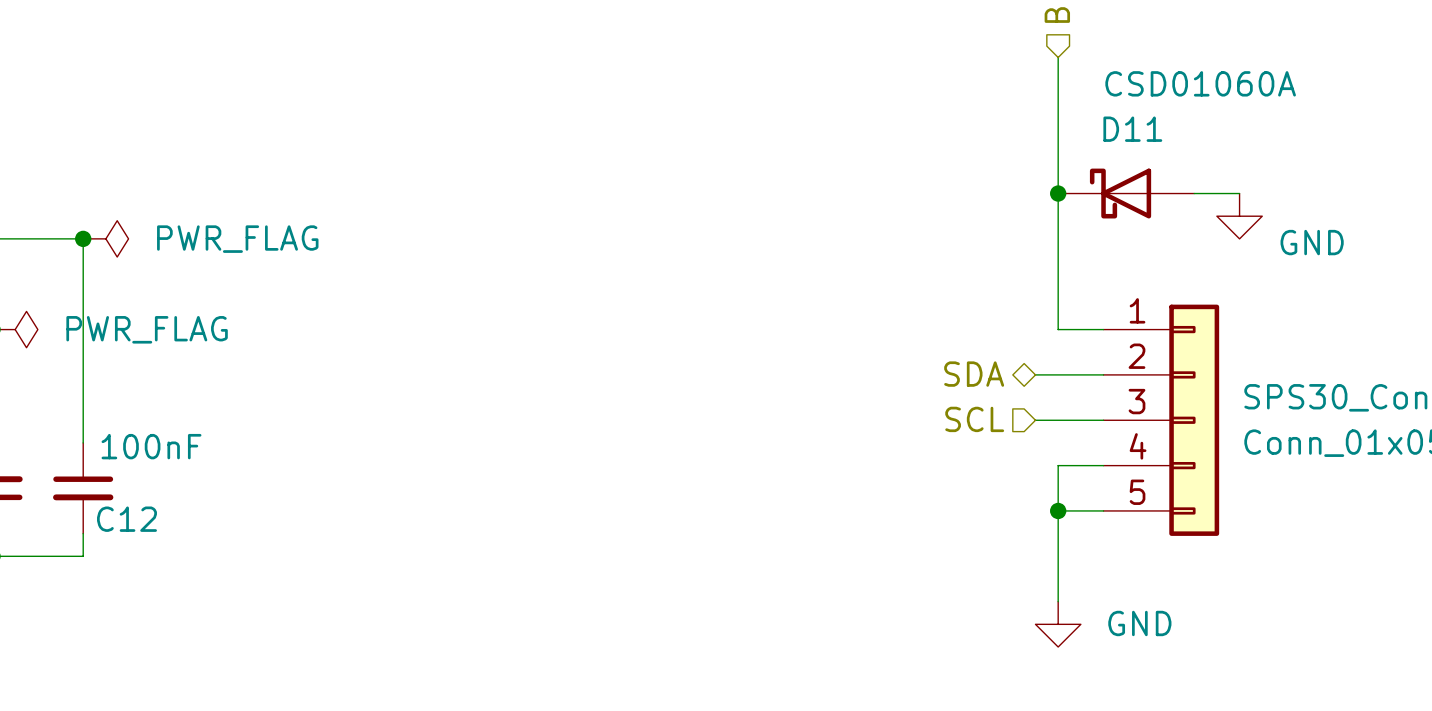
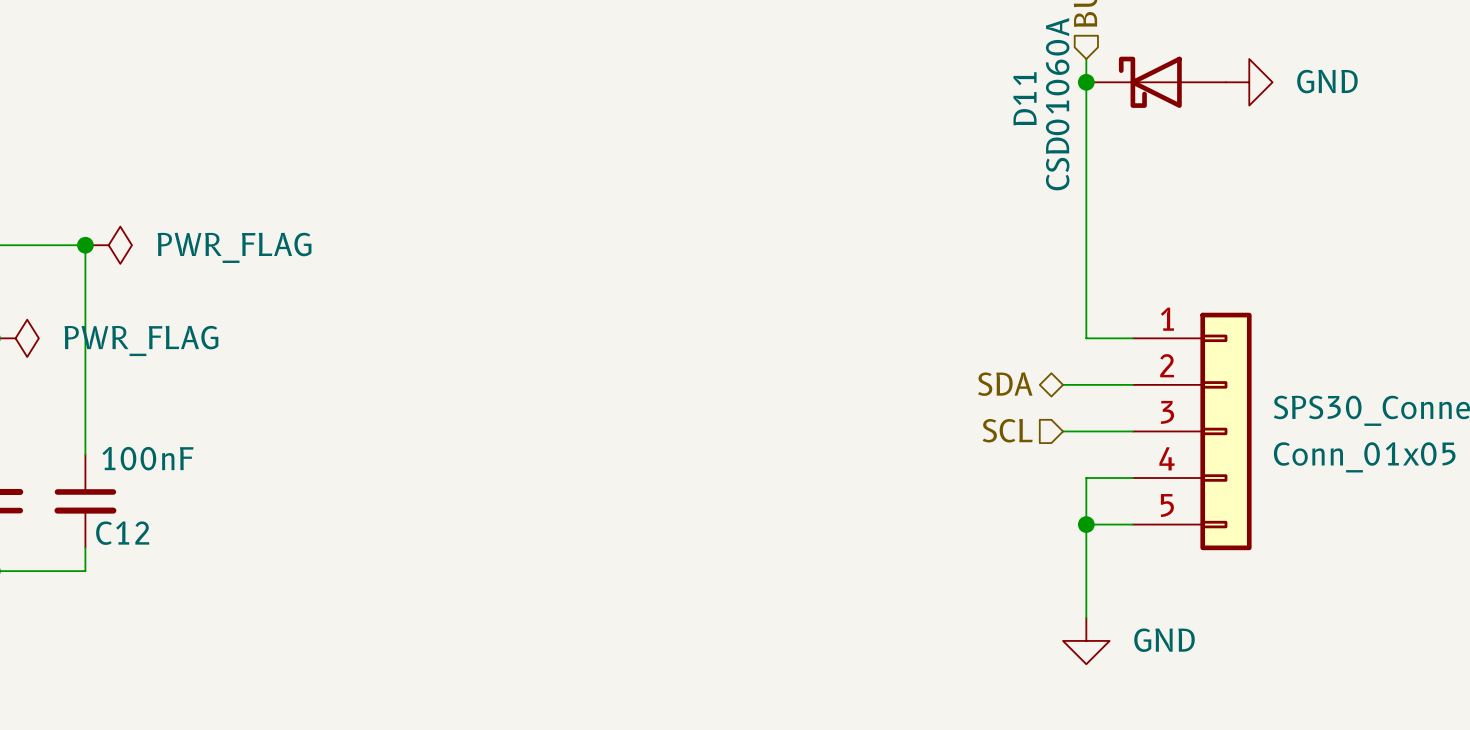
junction: none -> (1086, 82)
D11 value rotation: 0° (1200, 83) -> 90° counterclockwise (1057, 104)
D11 name rotation: 0° (1132, 129) -> 90° counterclockwise (1024, 98)
D11 name position: D11 (1132, 129) -> D11 (1024, 98)
junction: (1058, 193) -> none
D11 position: (1126, 193) -> (1156, 82)
wire: (1194, 193) (1239, 193) -> none
power symbol rotation: 0° (1239, 216) -> 90° counterclockwise (1249, 82)
power symbol position: GND (1239, 216) -> GND (1249, 82)

